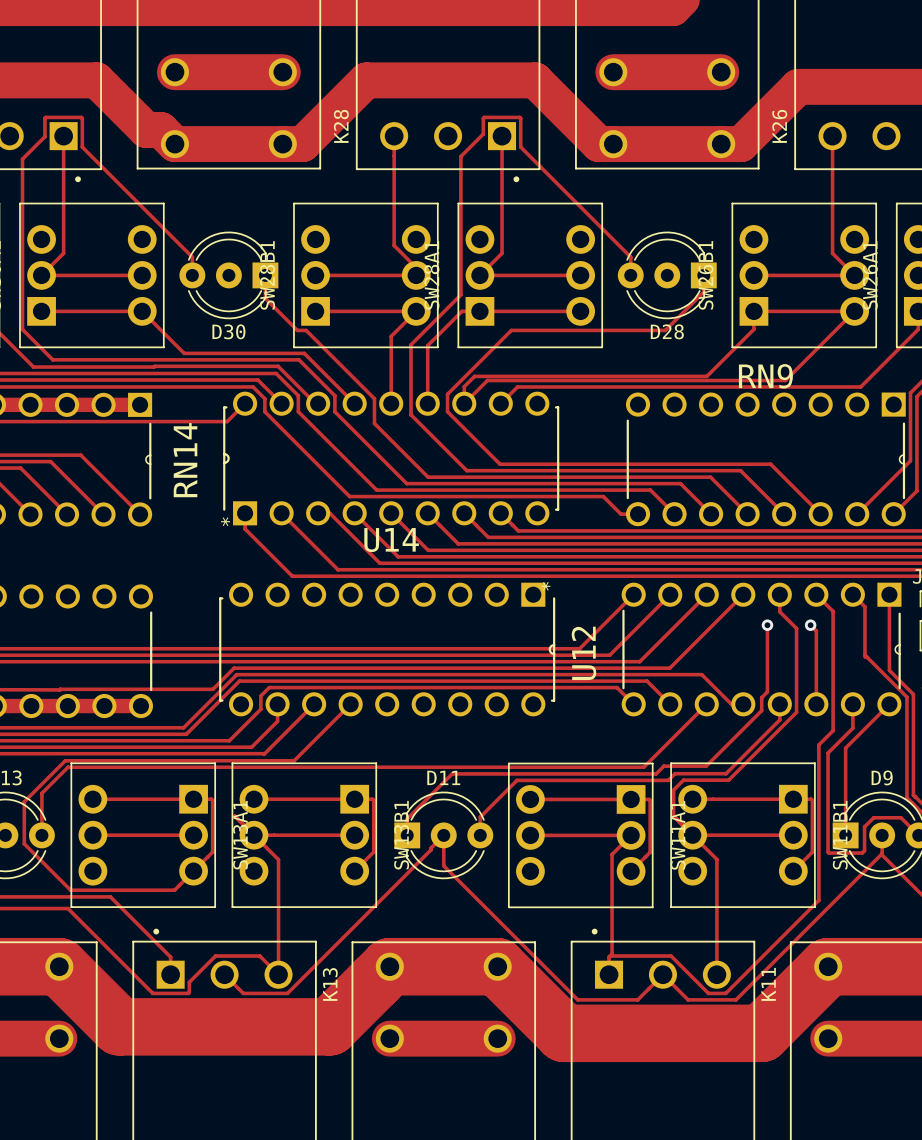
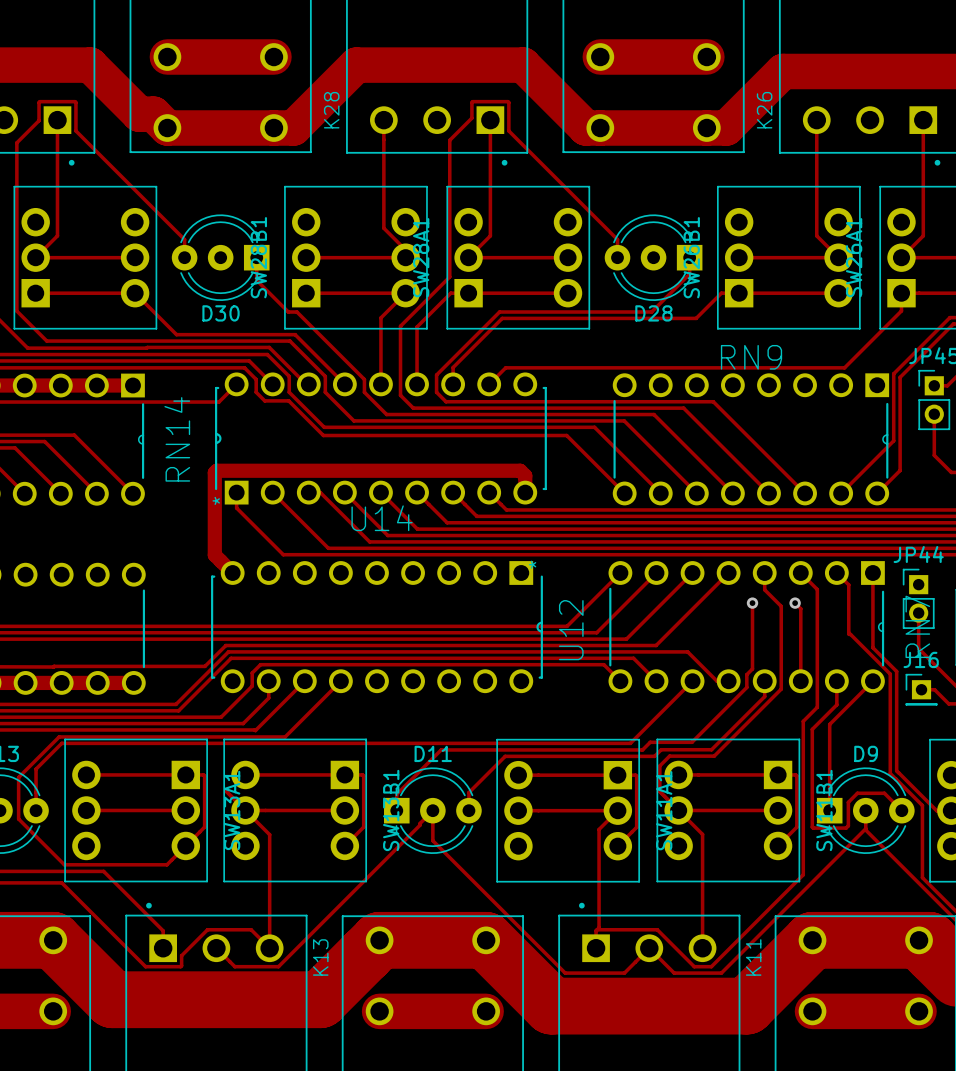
track: (753, 311) (753, 329) (706, 376) (474, 376) -> (739, 293) (721, 293) (696, 318) (502, 318) (463, 357)
track: (854, 311) (785, 380) (487, 380) (464, 403) -> none
track: (334, 411) (406, 483) (680, 483) -> (325, 392) (353, 420) (624, 420) (666, 463)
track: (374, 411) (374, 423) (428, 477) (710, 477) -> (364, 392) (386, 414) (653, 414) (696, 456)
track: (273, 420) (349, 496) (603, 496) (620, 514) (638, 514) -> (264, 400) (288, 400) (323, 435) (566, 435) (624, 493)
track: (457, 421) (500, 464) (770, 464) -> (446, 401) (713, 401) (755, 444)
track: (423, 427) (466, 470) (740, 470) -> (413, 408) (683, 408) (726, 450)
track: (333, 447) (376, 490) (650, 490) -> (324, 427) (594, 427) (636, 469)
track: none -> (525, 492) (525, 475) (520, 470) (216, 470) (214, 472) (214, 555) (232, 572)

